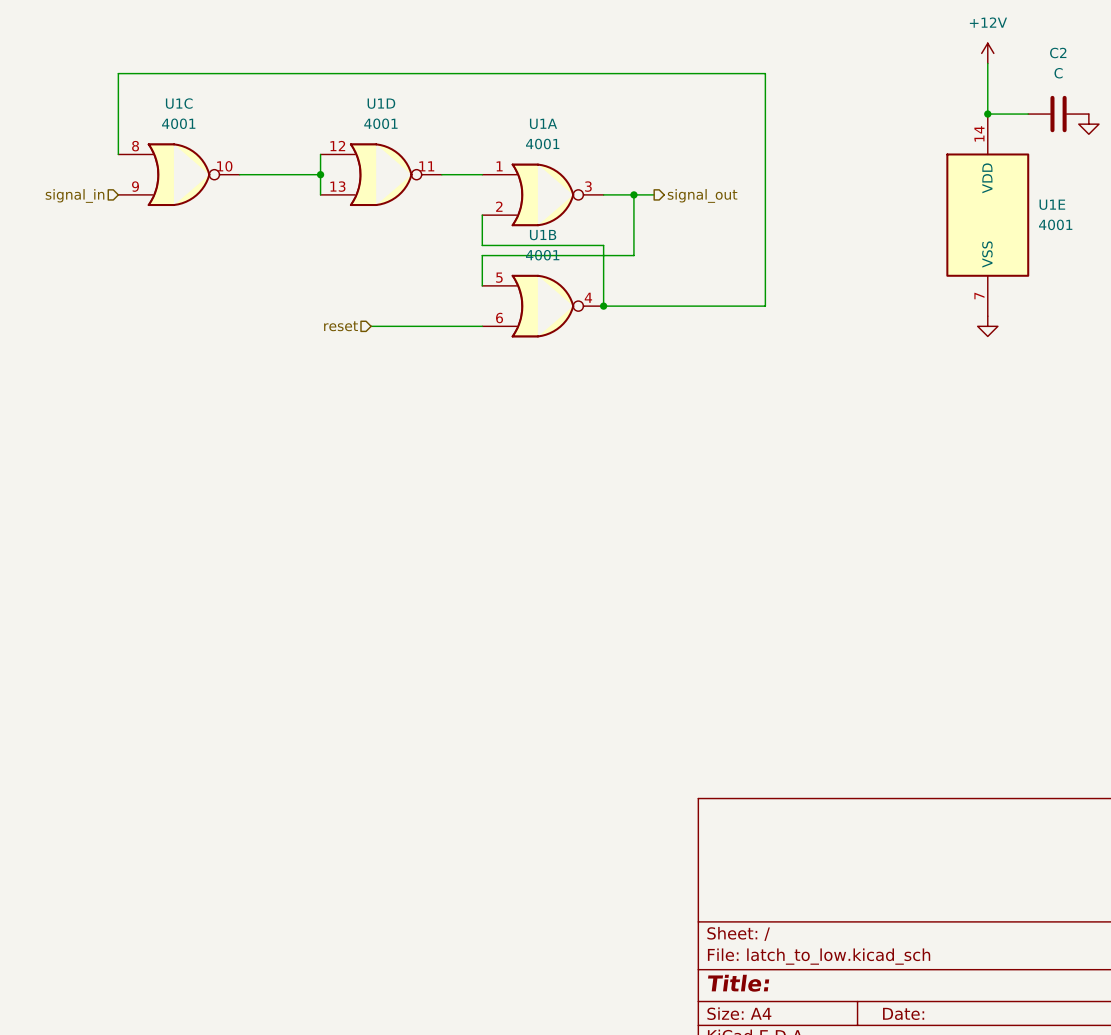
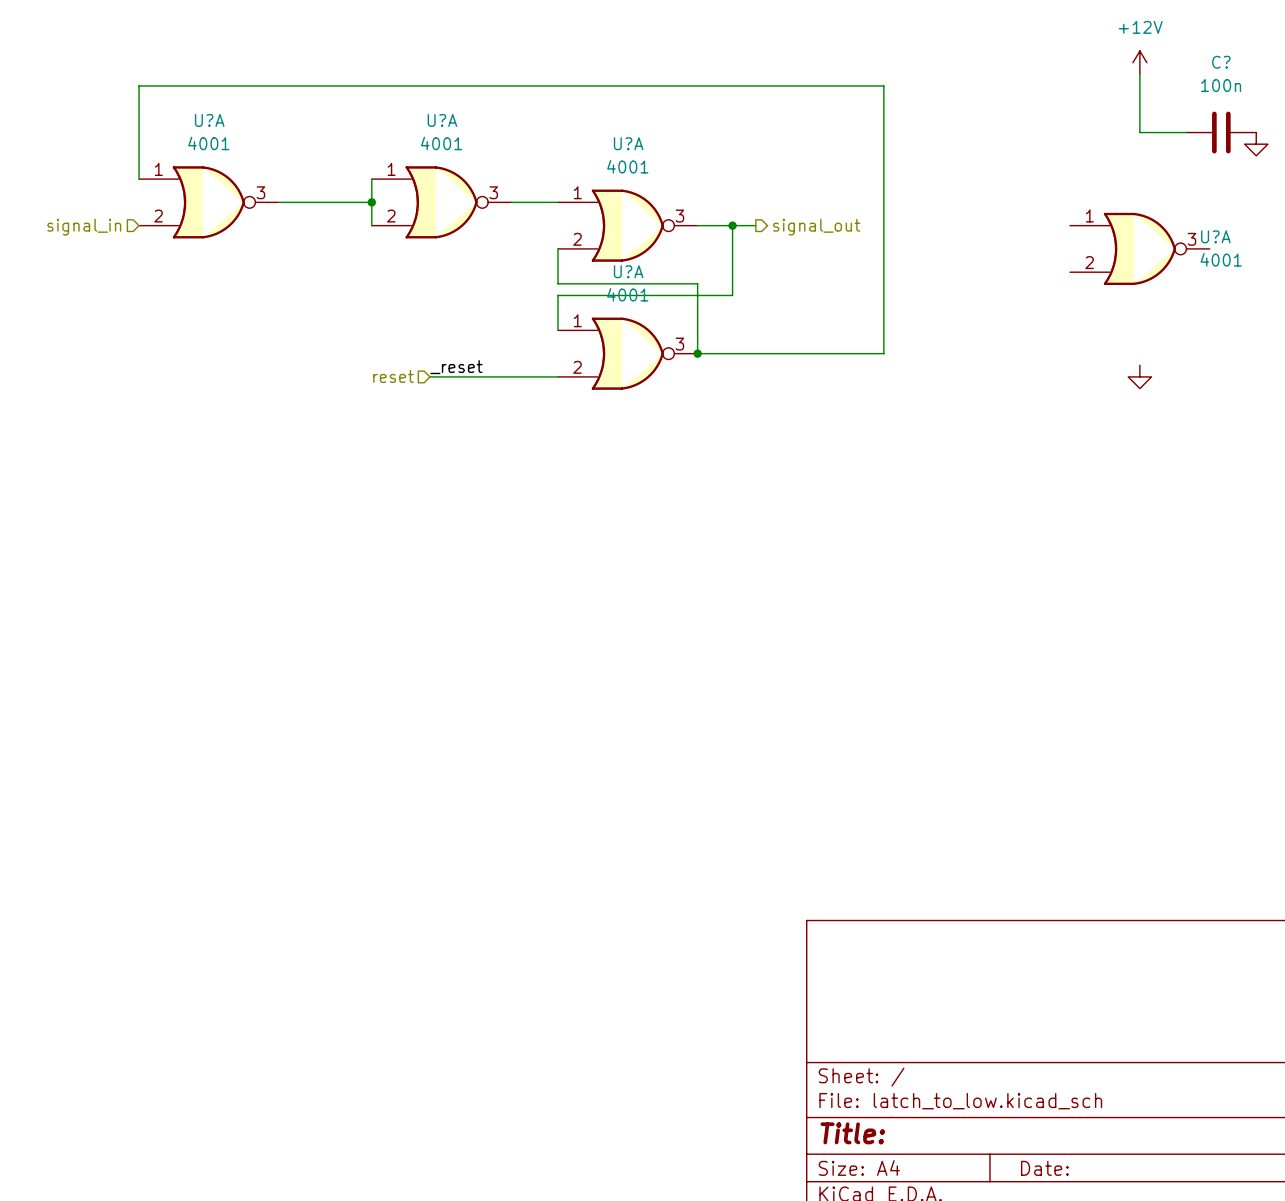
C2 name: C2 (1058, 53) -> C? (1221, 62)
C2 value: C (1058, 73) -> 100n (1221, 85)
U1C name: U1C (179, 103) -> U?A (209, 120)
U1D name: U1D (381, 103) -> U?A (442, 120)
junction: (987, 114) -> none
U1A name: U1A (543, 123) -> U?A (628, 143)
U1C pin number: 8 (135, 146) -> 1 (158, 169)
U1D pin number: 12 (337, 146) -> 1 (391, 169)
U1C pin number: 10 (224, 166) -> 3 (260, 192)
U1D pin number: 11 (426, 166) -> 3 (493, 192)
U1C pin number: 9 (135, 186) -> 2 (158, 216)
U1D pin number: 13 (337, 186) -> 2 (391, 216)
U1E: 4001 (987, 215) -> none
U?A: none -> 4001 (1139, 248)
U1B name: U1B (543, 235) -> U?A (628, 271)
U1B pin number: 5 (499, 277) -> 1 (577, 320)
U1B pin number: 4 (588, 297) -> 3 (679, 344)
U1B pin number: 6 (499, 318) -> 2 (577, 367)
label: none -> _reset (456, 367)

